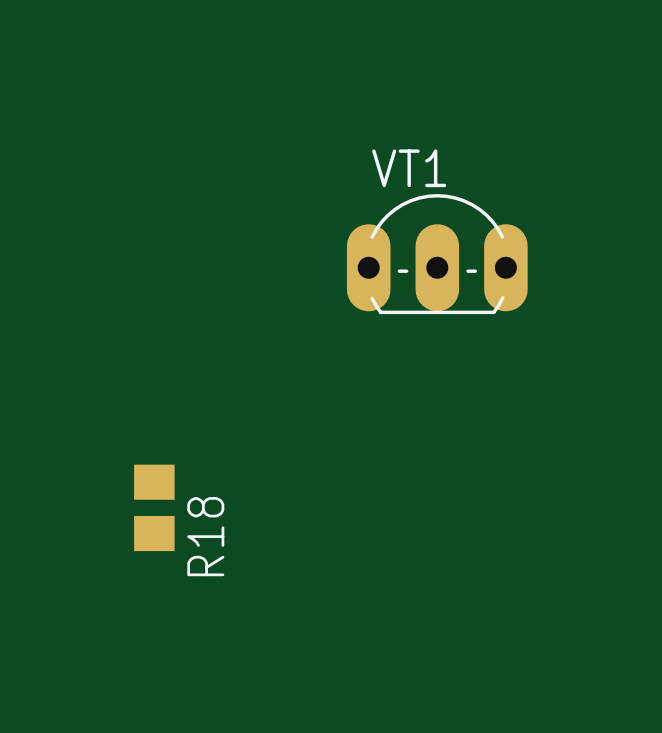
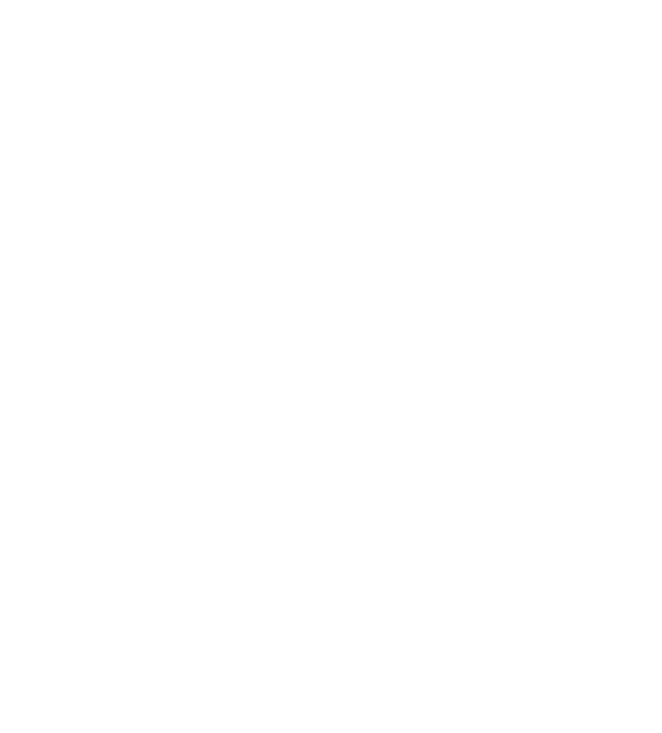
VT1: (437, 254) -> none
R18: (154, 507) -> none

